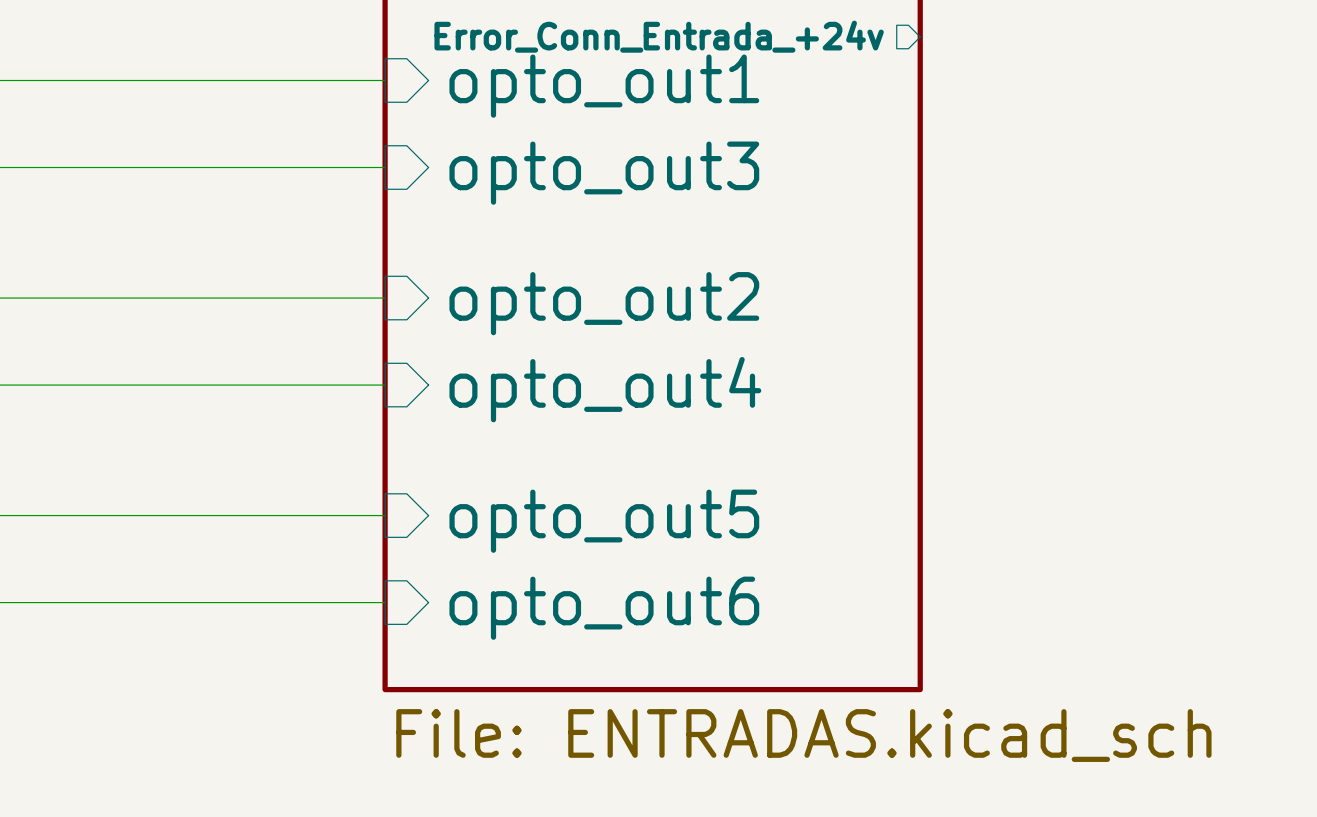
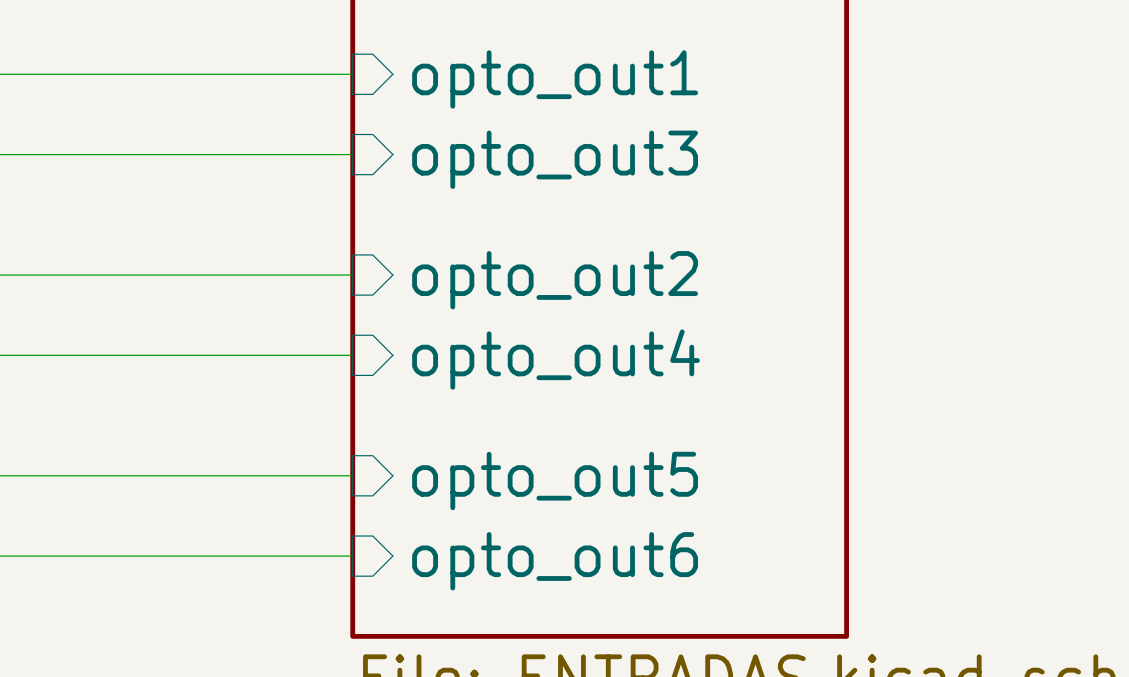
sheet pin: Error_Conn_Entrada_+24v (659, 36) -> none

